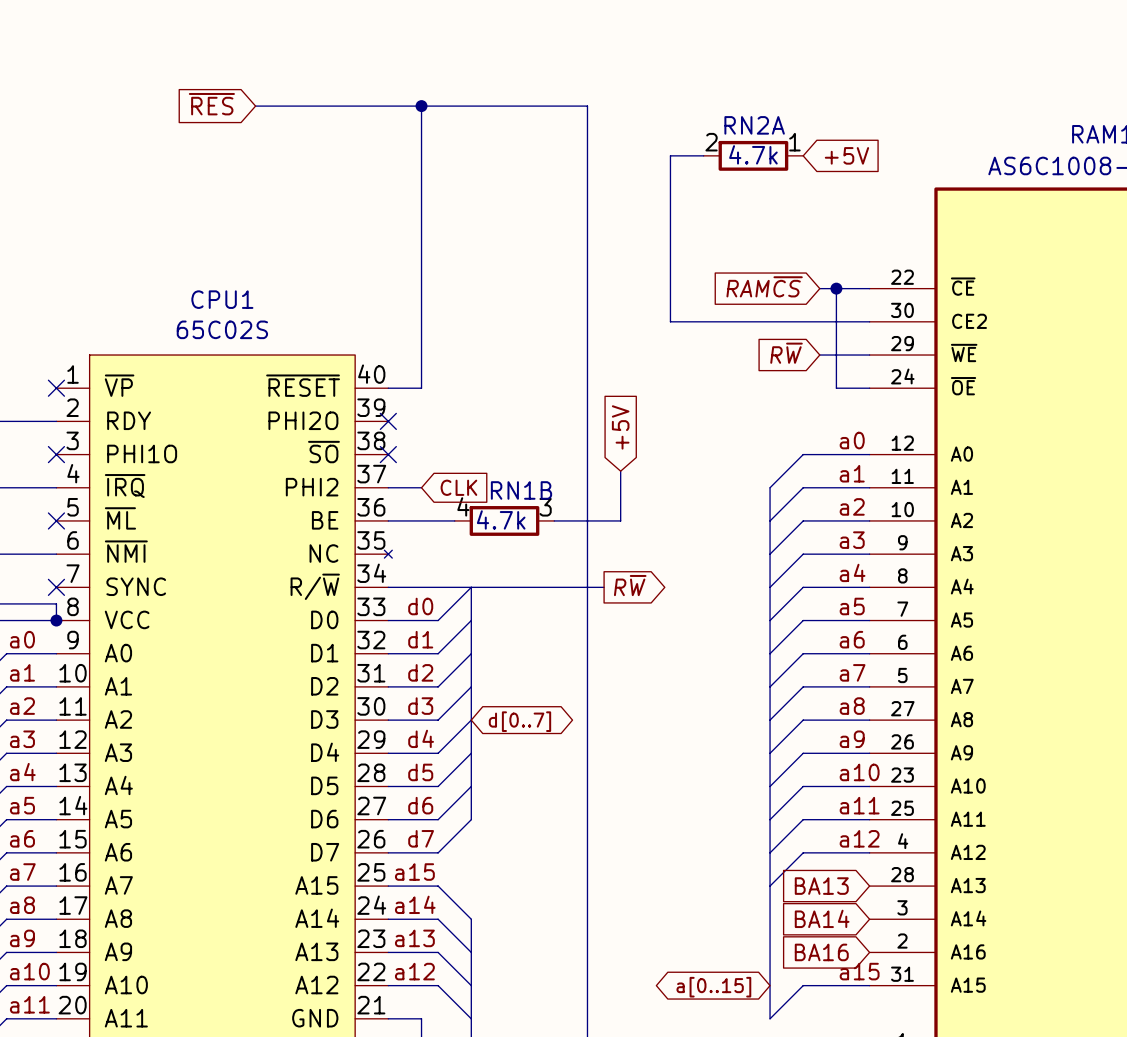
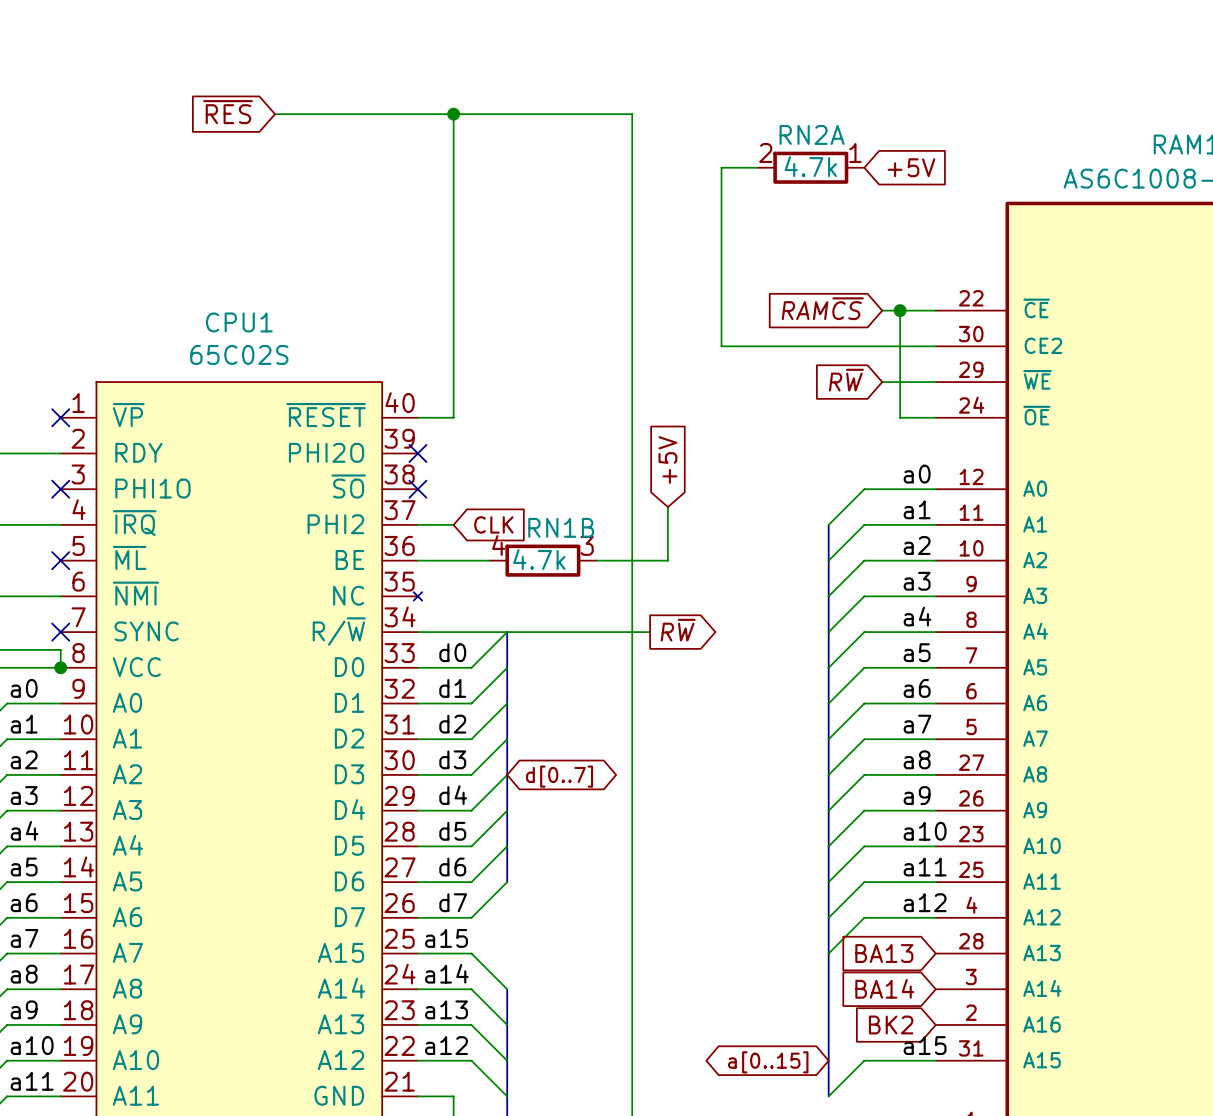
global label: BA16 (821, 952) -> BK2 (891, 1024)

